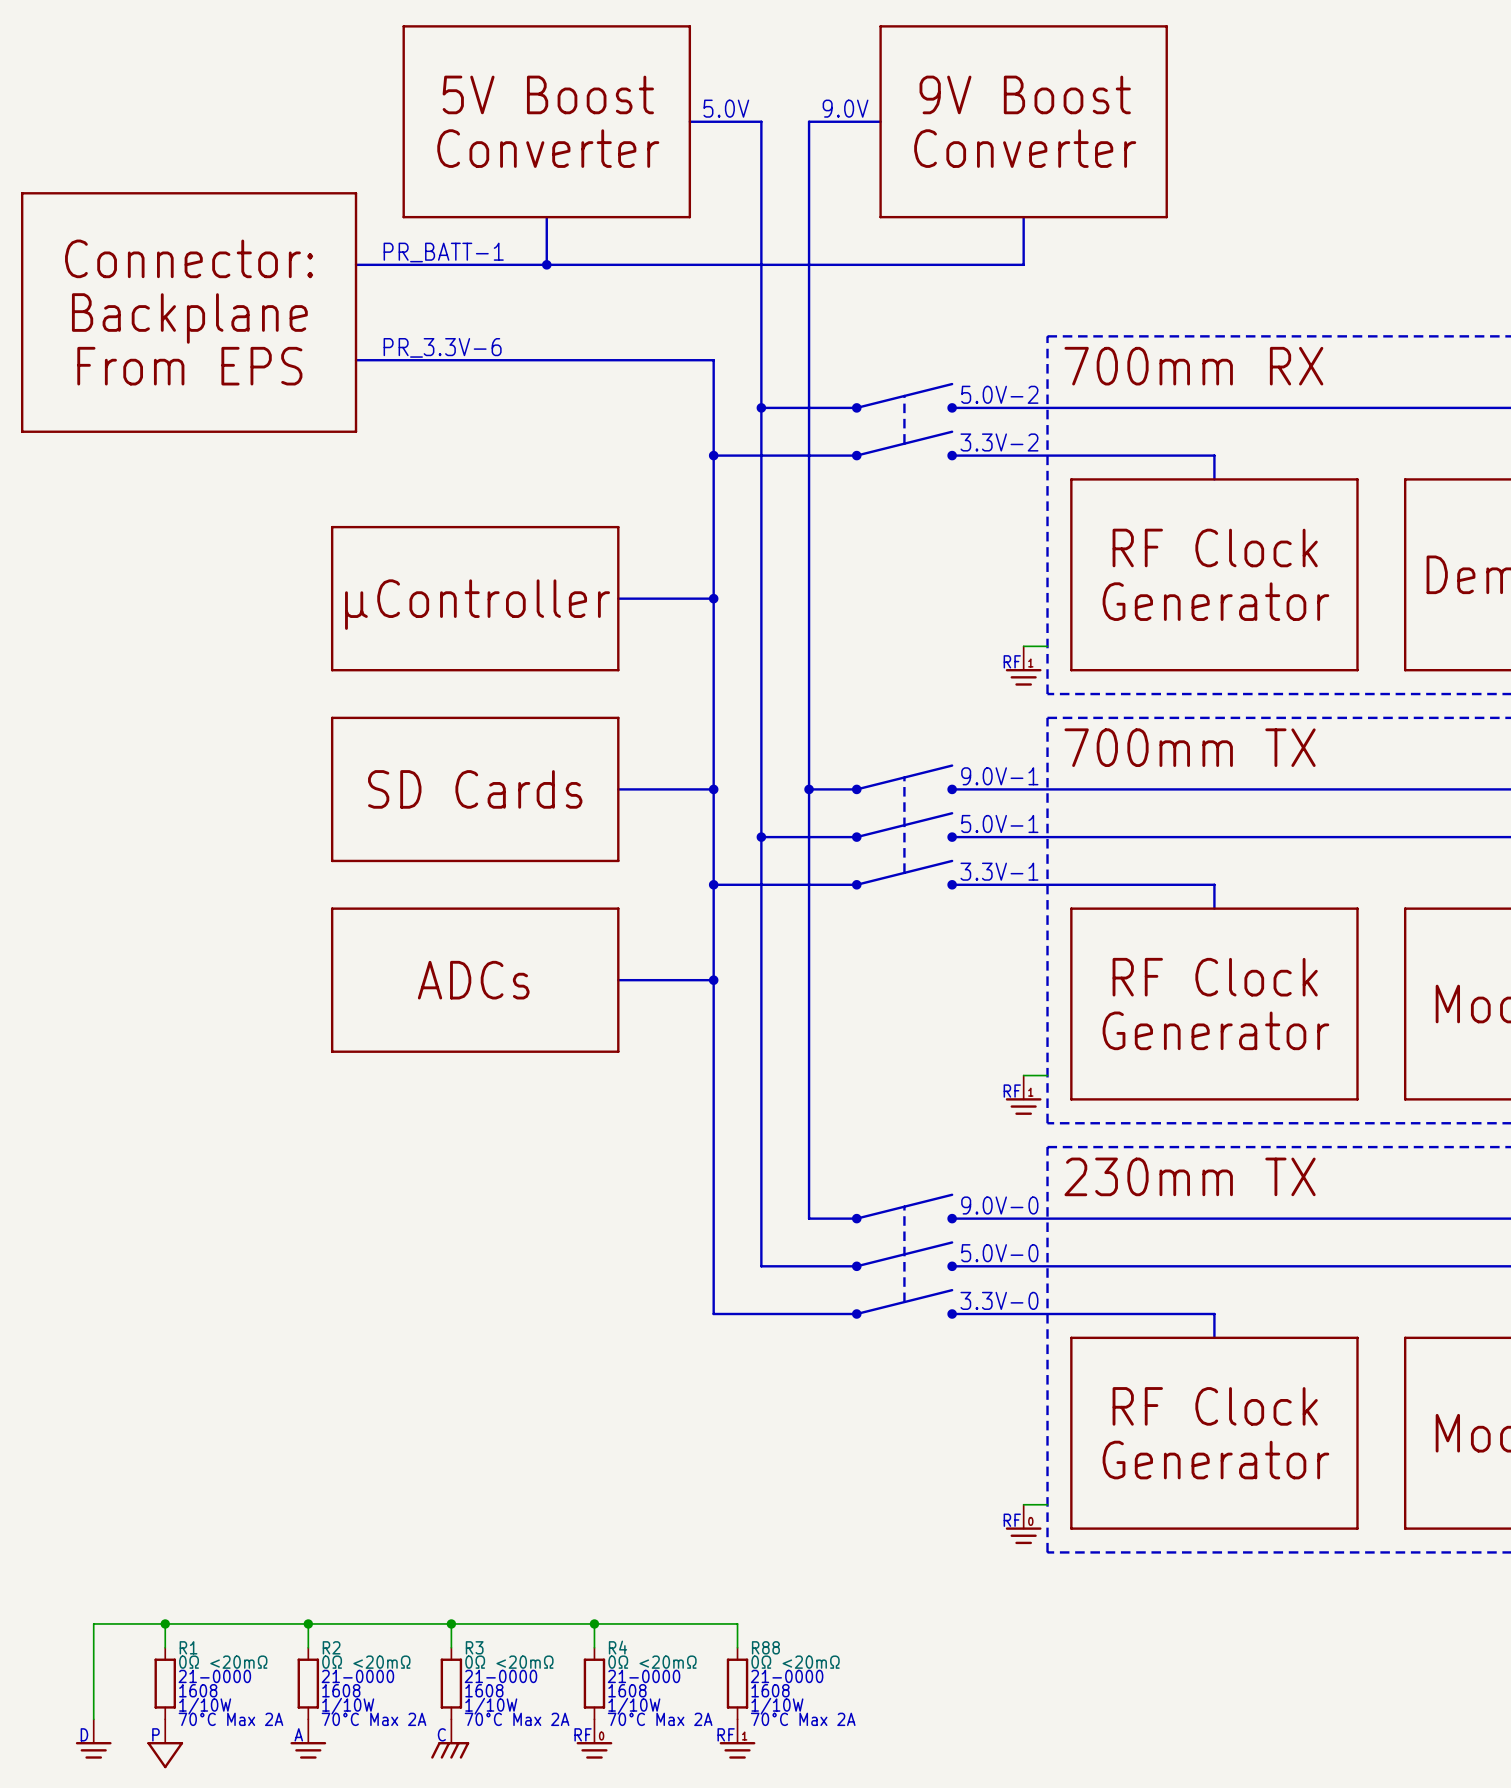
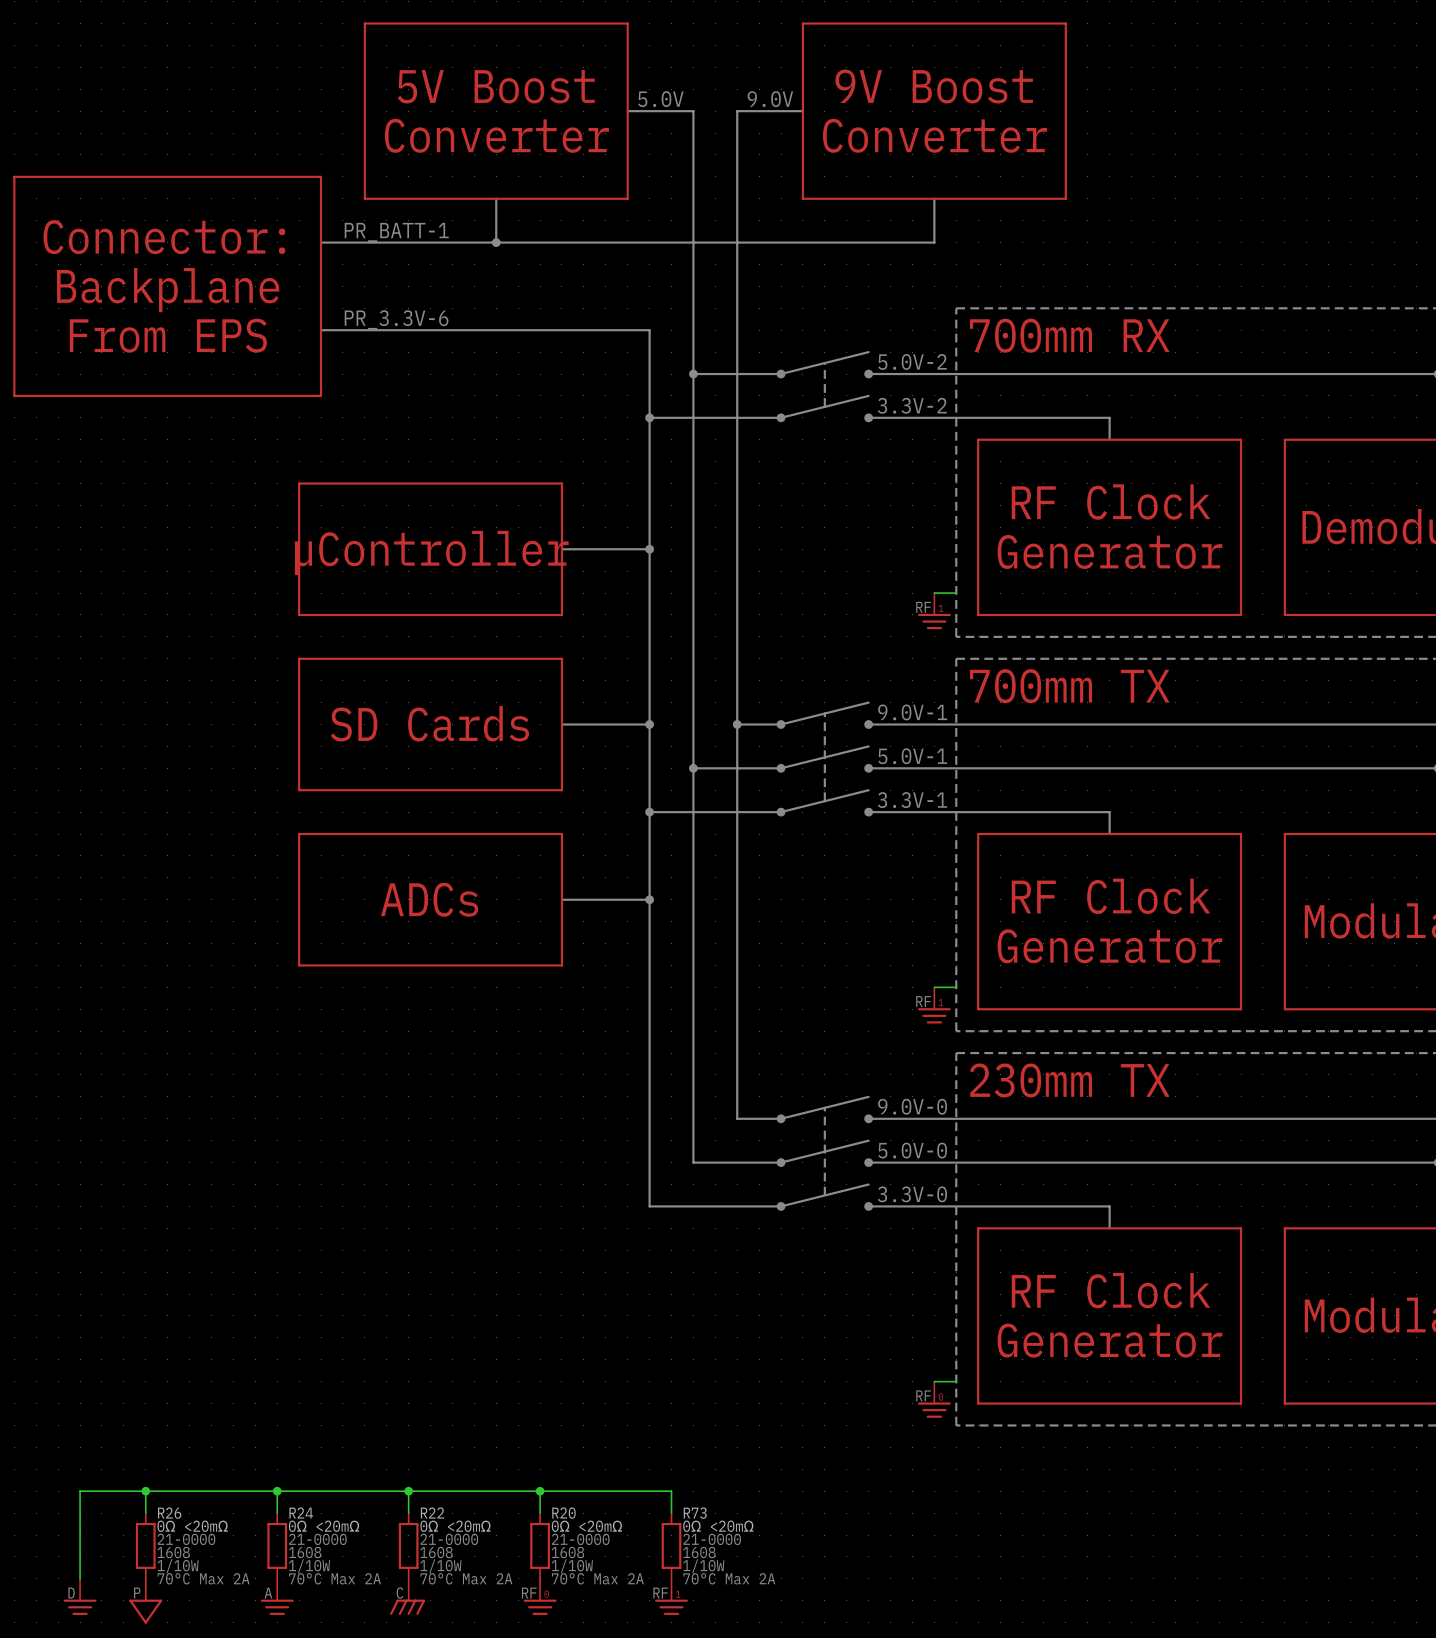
R1 name: R1 (188, 1647) -> R26 (169, 1513)
R2 name: R2 (331, 1647) -> R24 (301, 1513)
R3 name: R3 (474, 1647) -> R22 (432, 1513)
R4 name: R4 (617, 1647) -> R20 (563, 1513)
R88 name: R88 (765, 1647) -> R73 (695, 1513)

